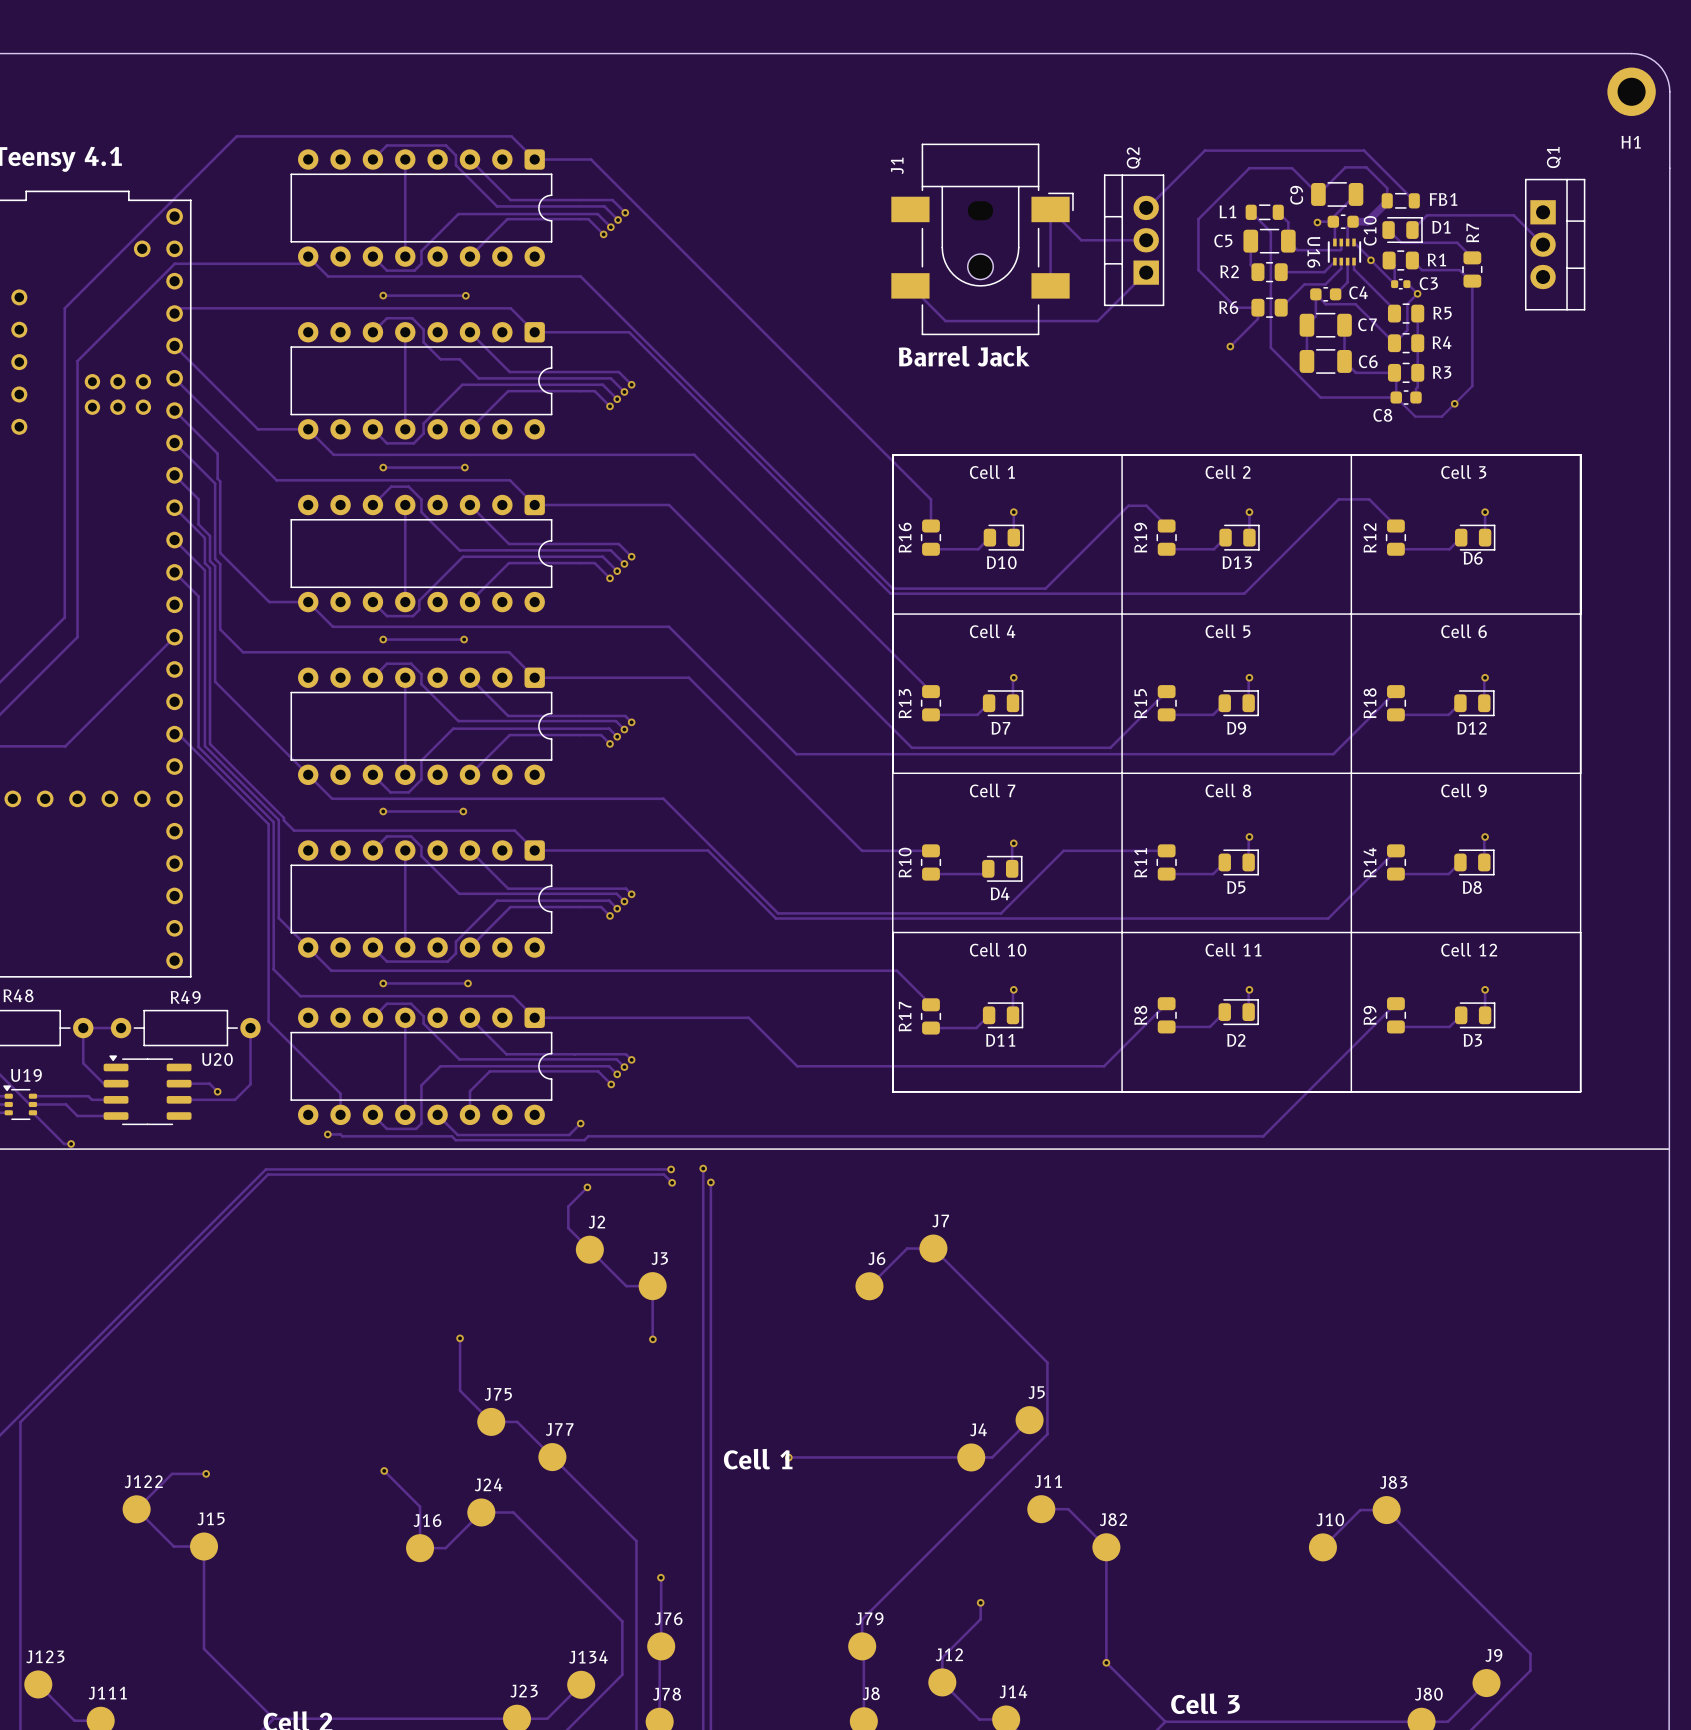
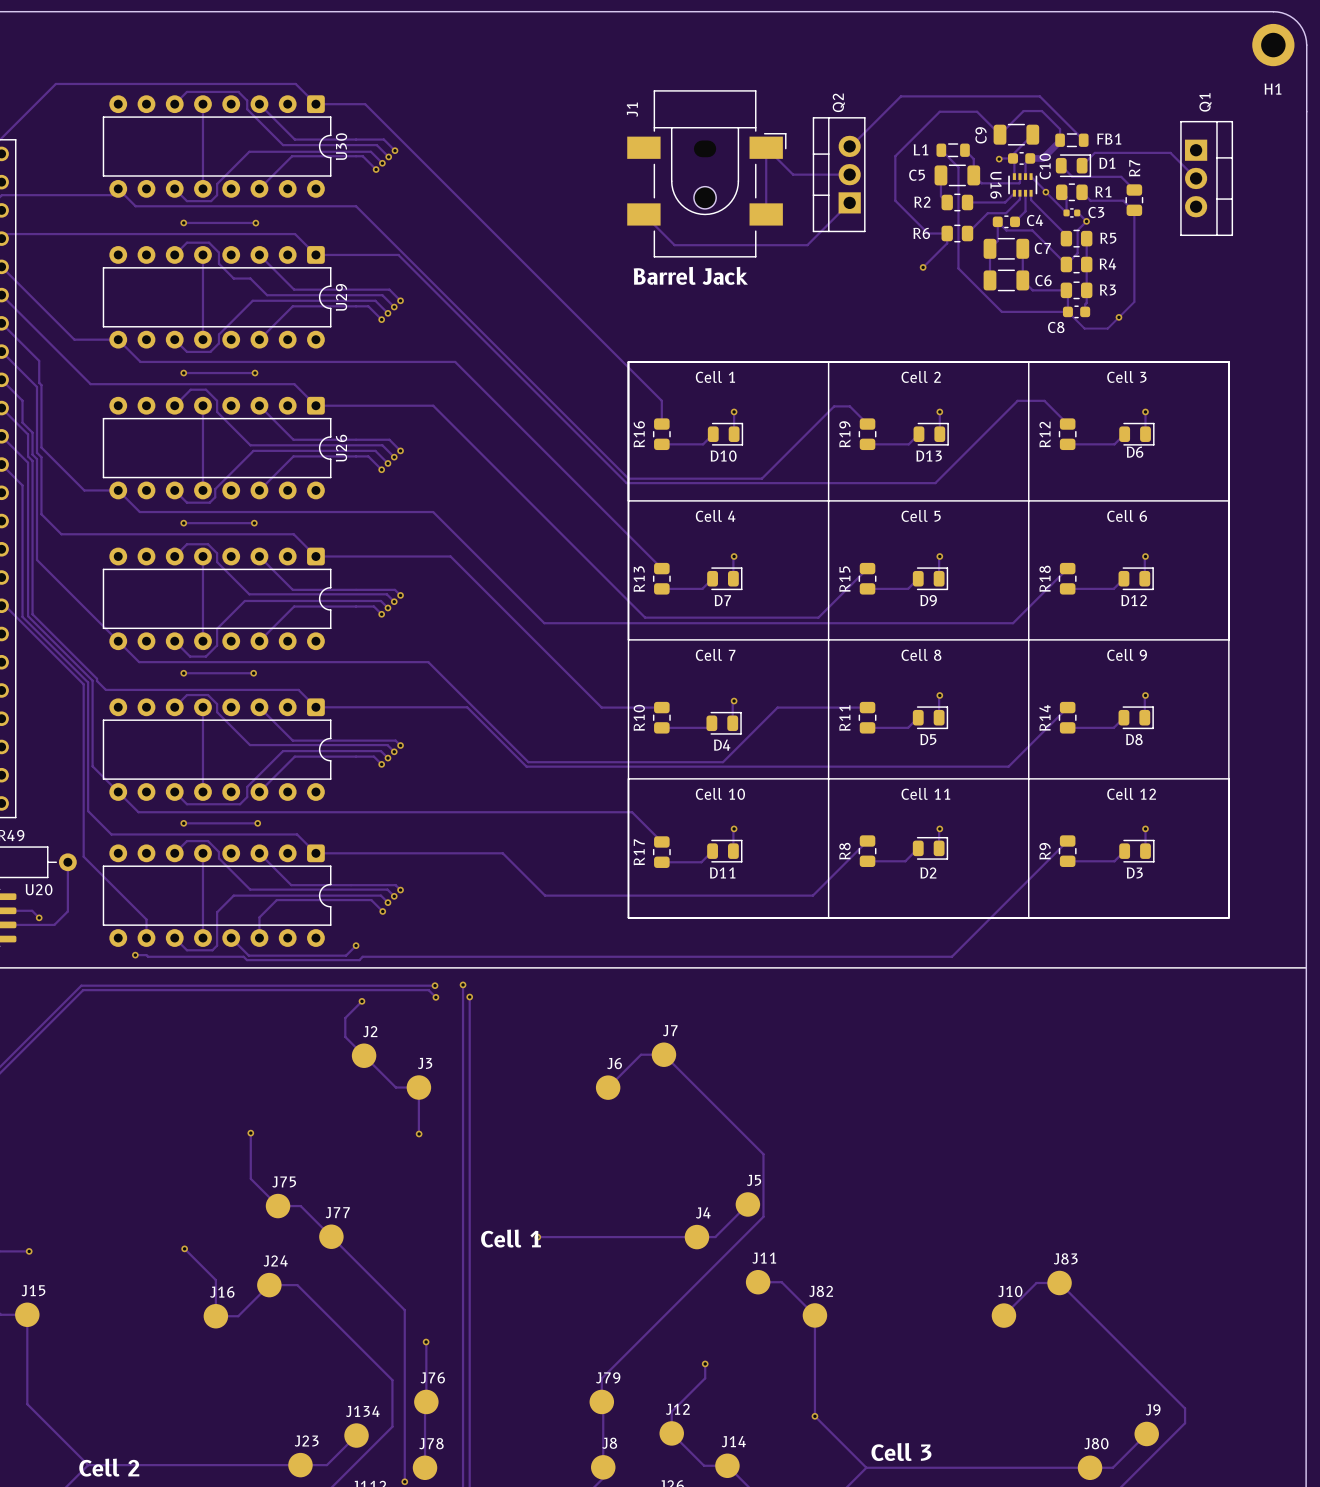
U30 name: none -> U30 (341, 146)
U29 name: none -> U29 (341, 297)
U26 name: none -> U26 (341, 448)

